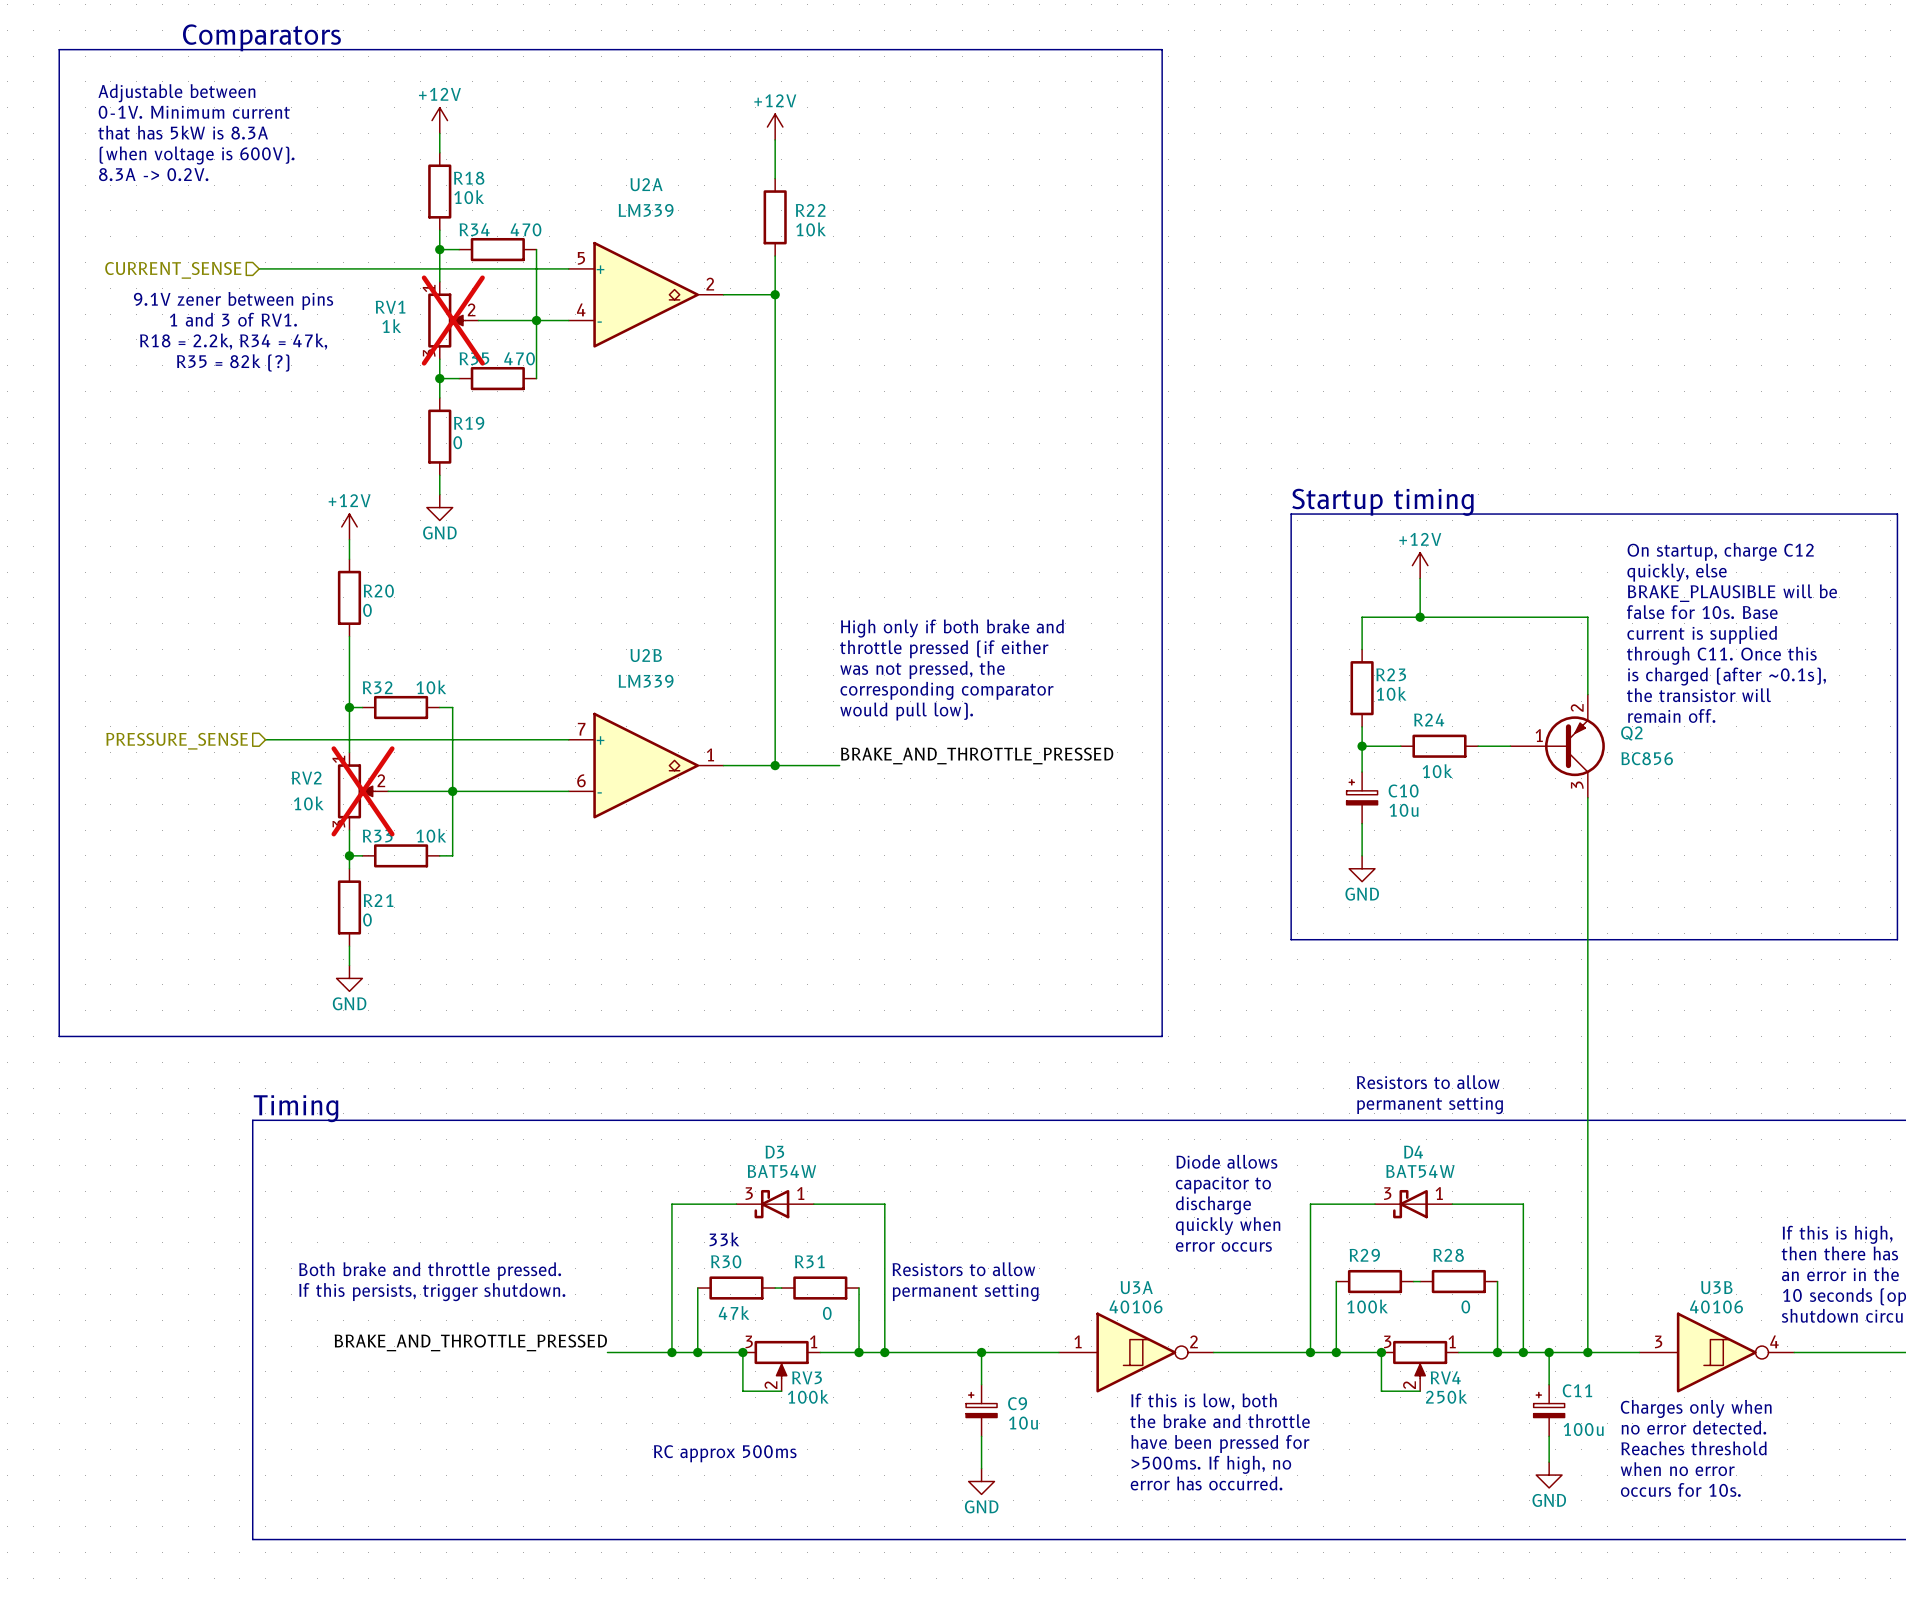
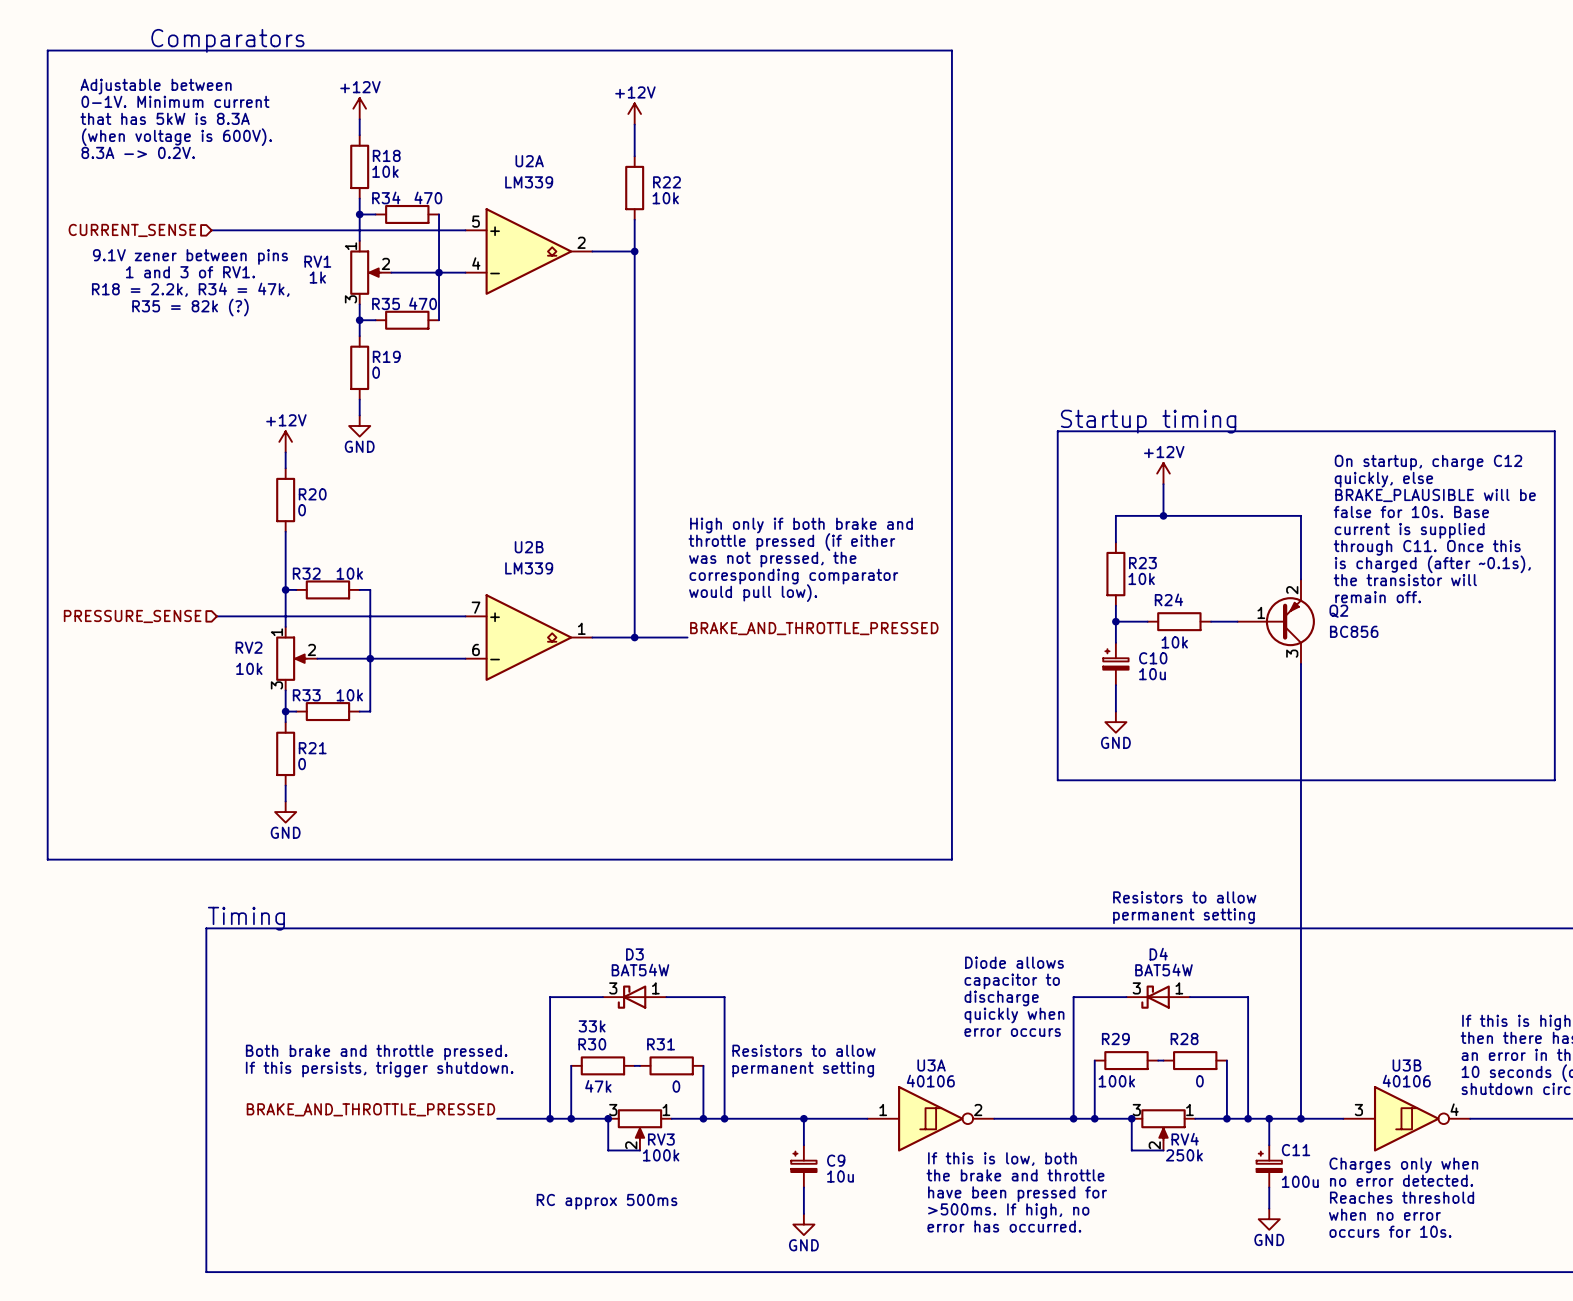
RV1 do-not-place cross: (453, 320) -> none
RV2 do-not-place cross: (363, 791) -> none

